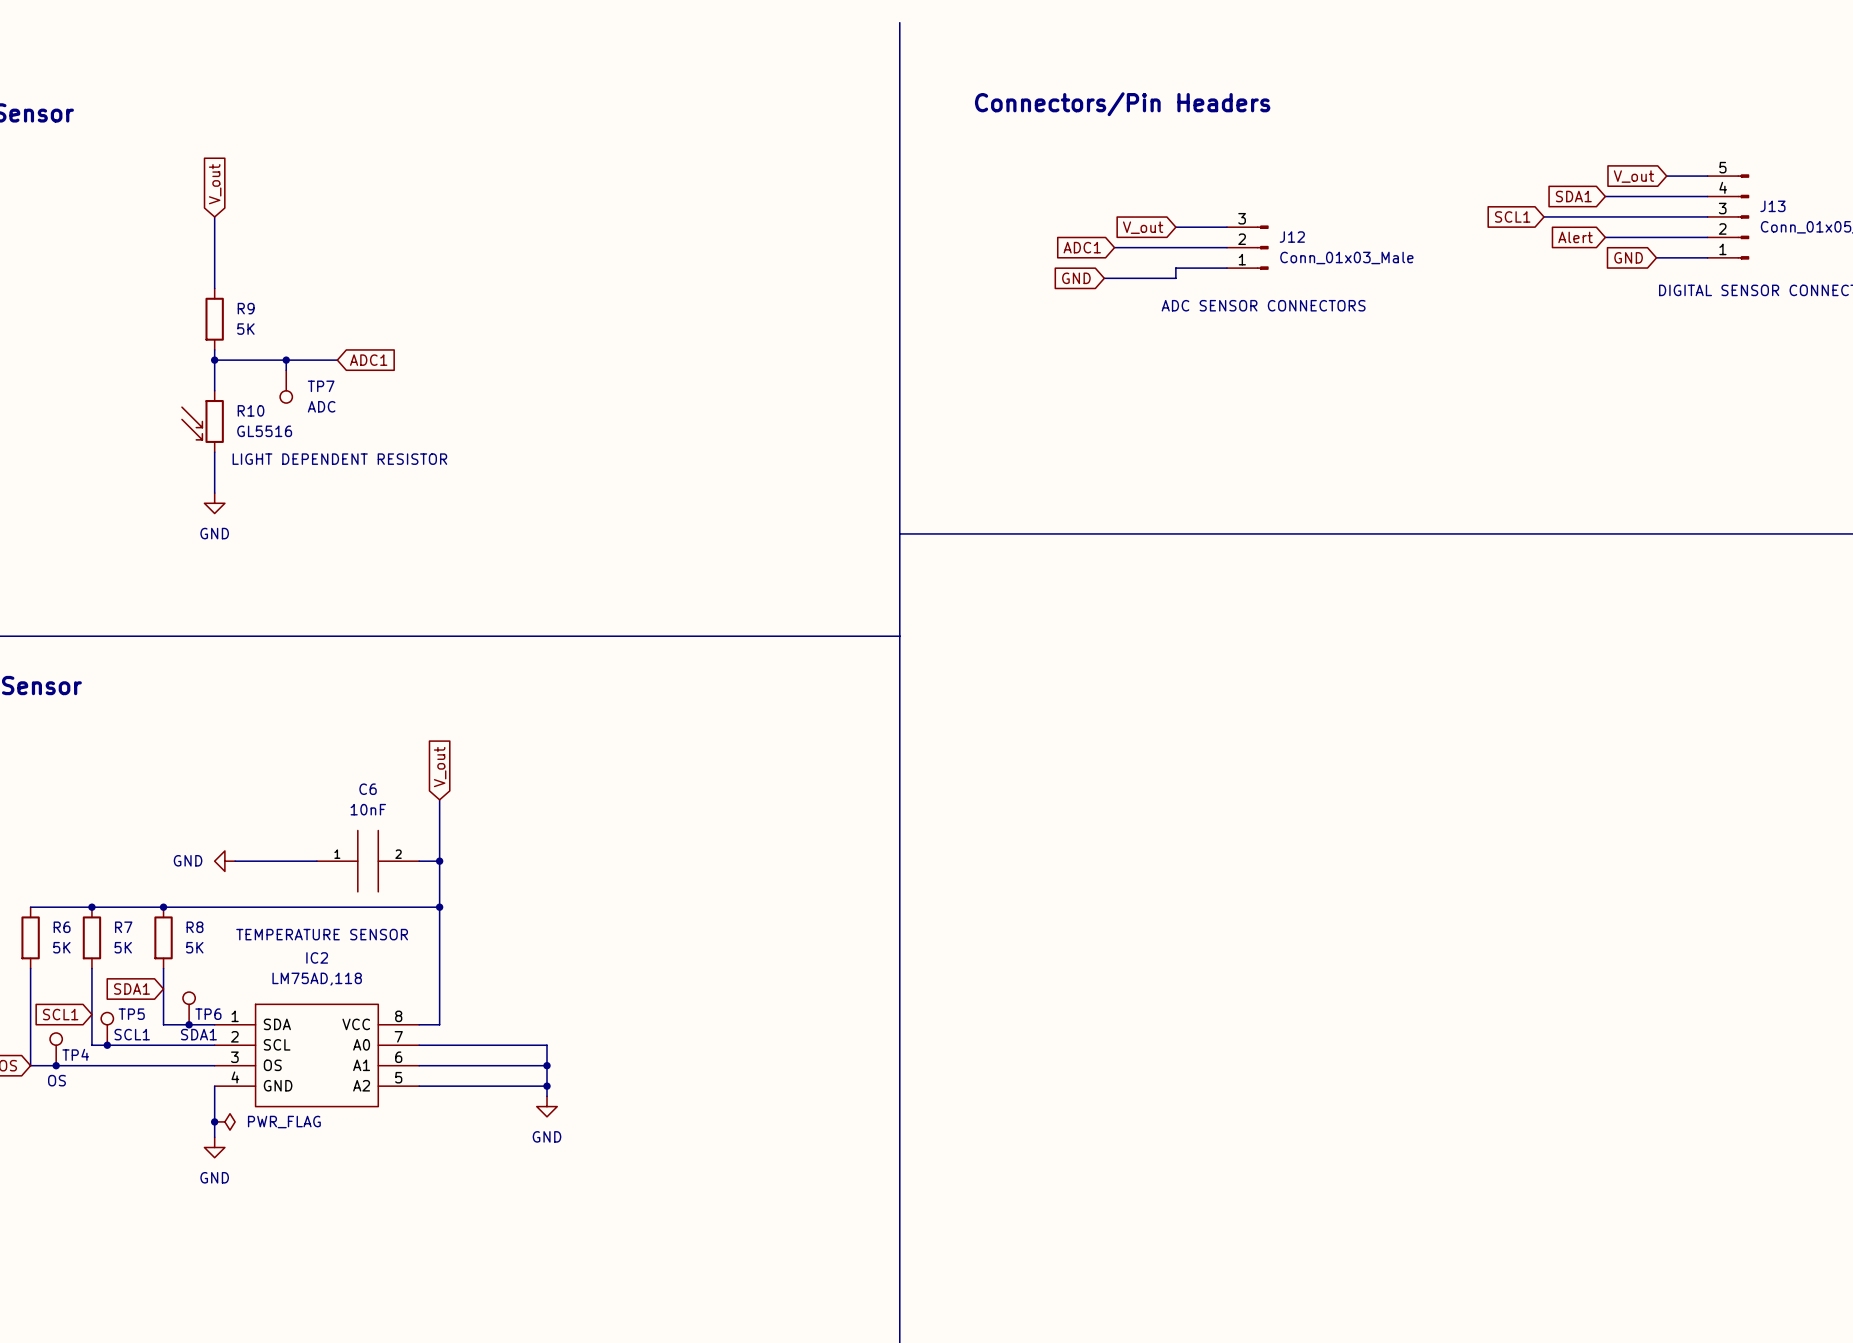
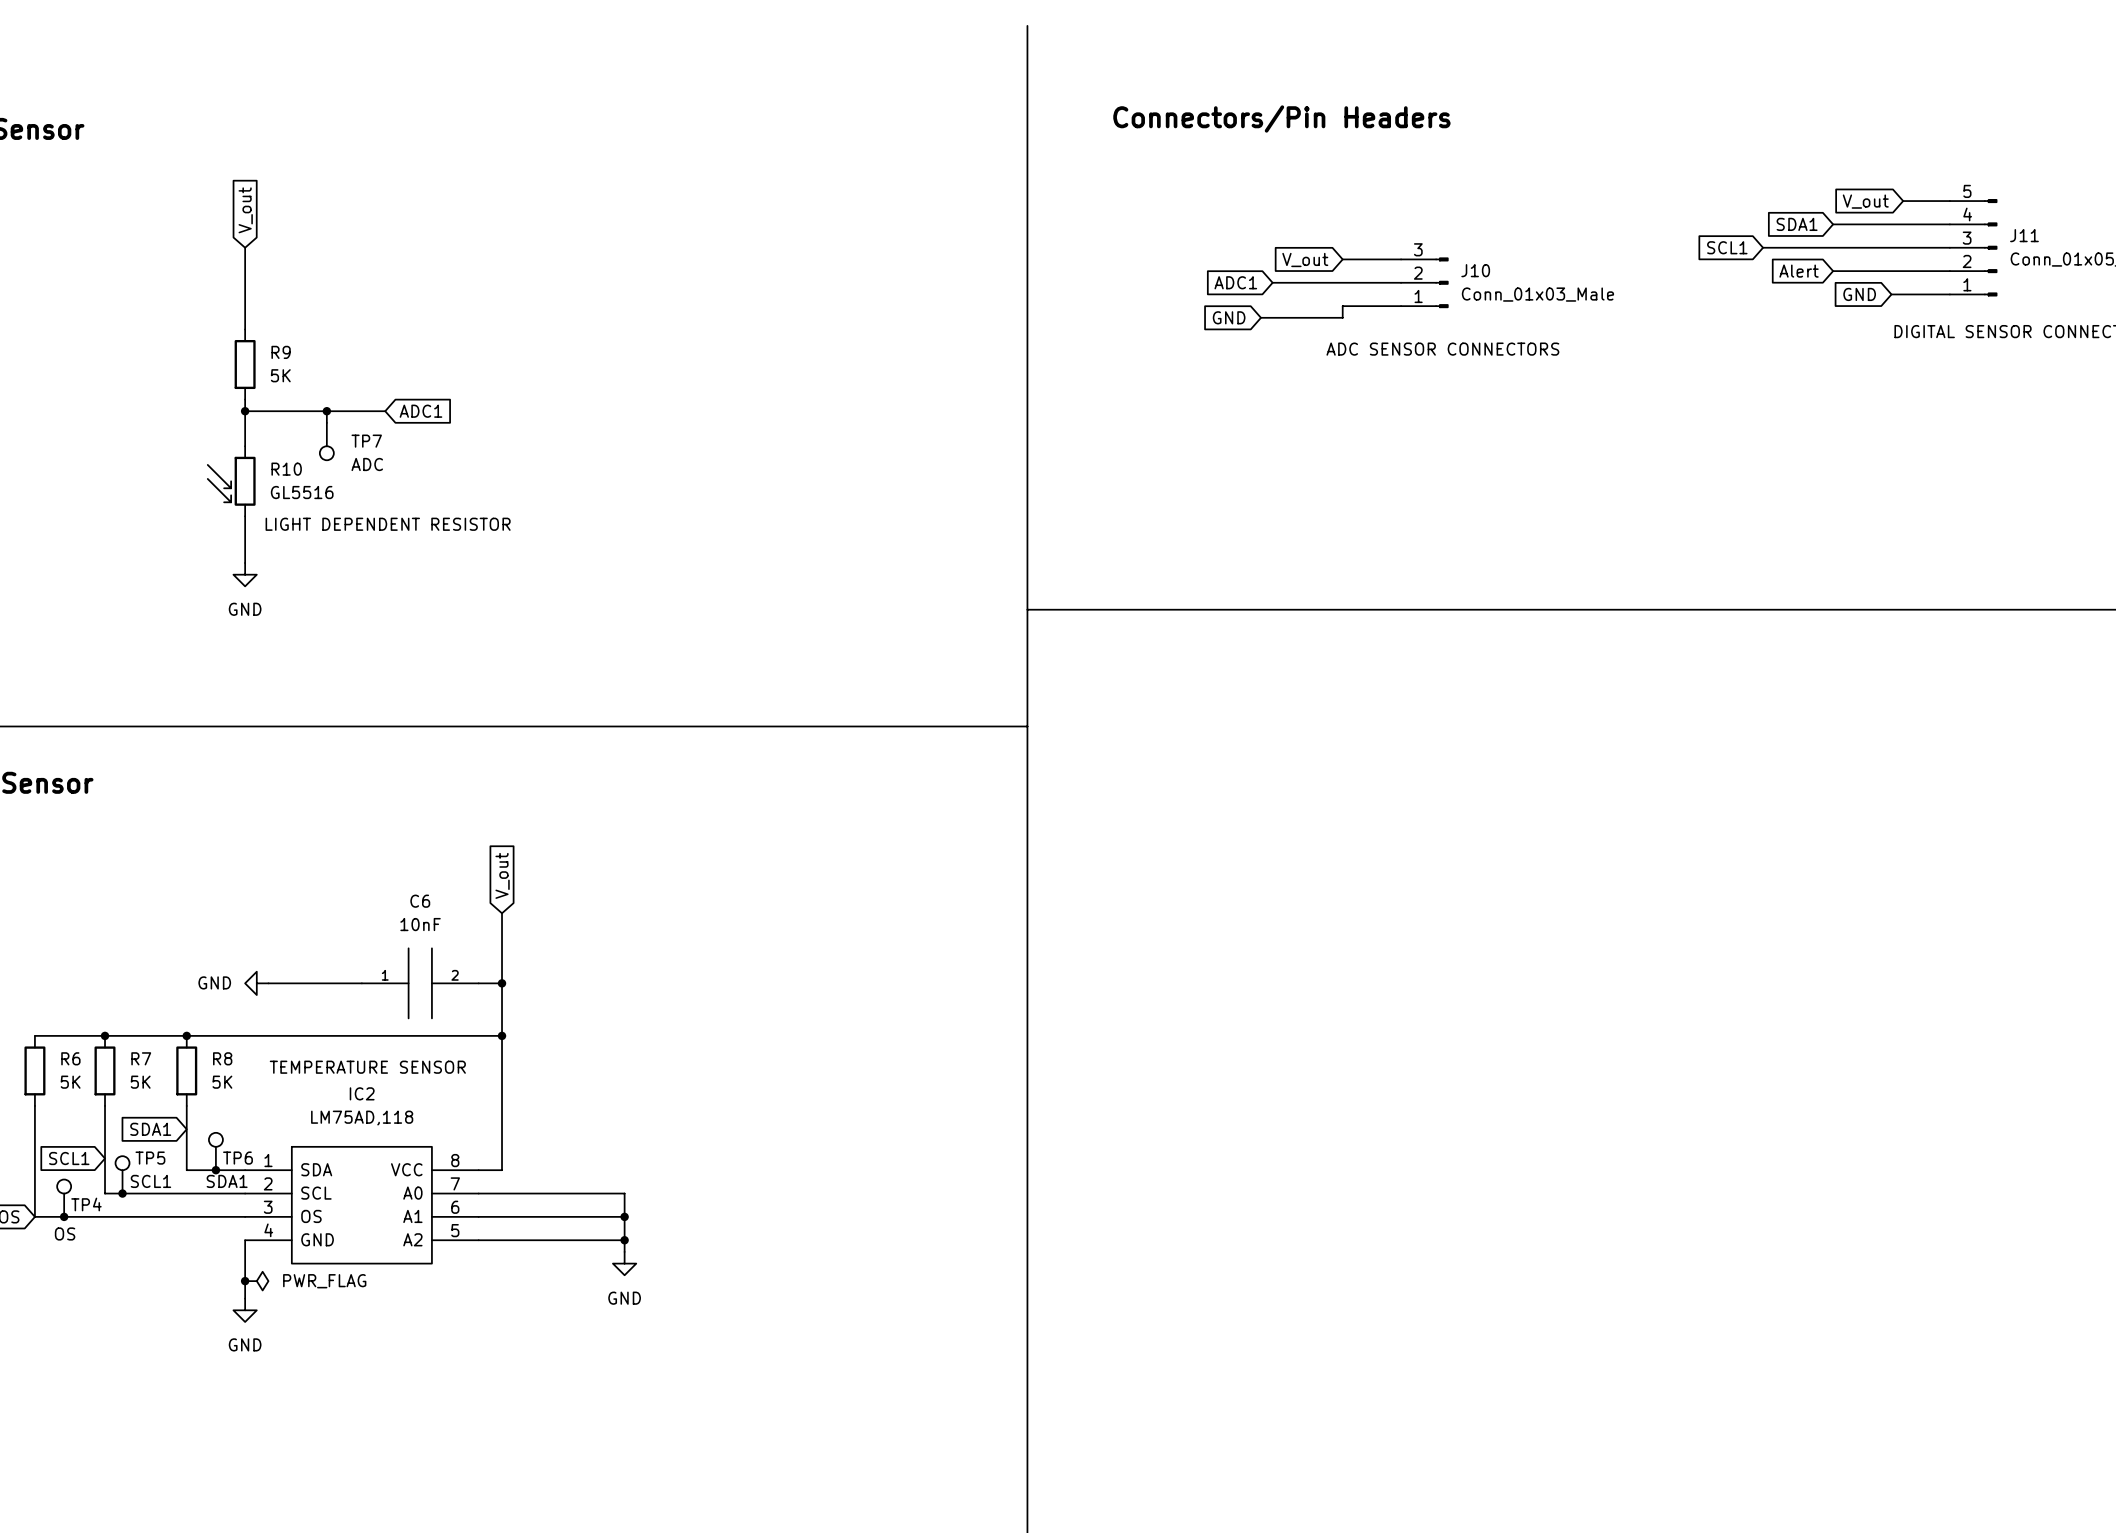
J13 name: J13 (1772, 206) -> J11 (2024, 235)
J12 name: J12 (1292, 237) -> J10 (1475, 270)

